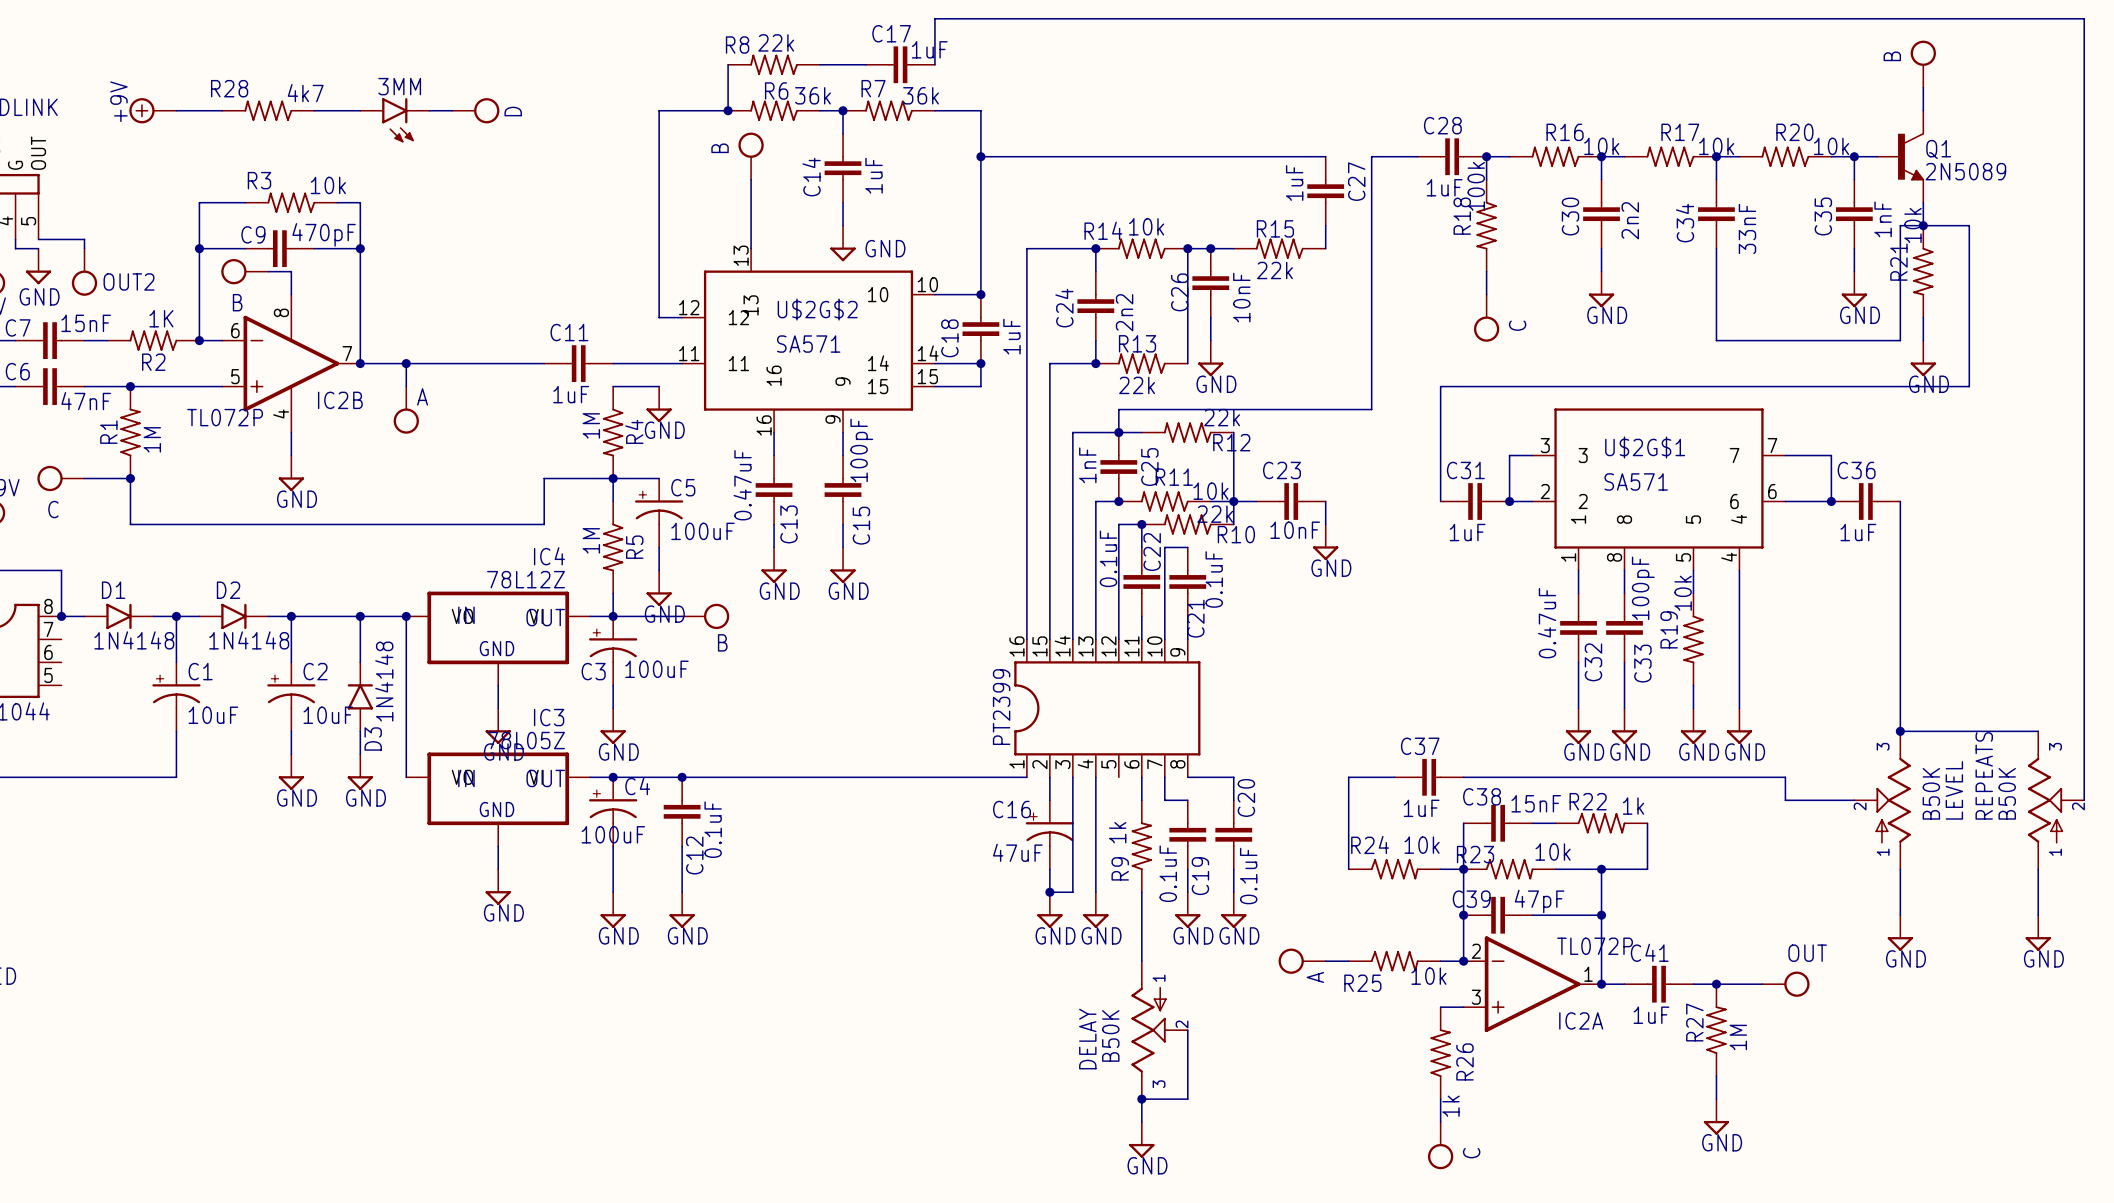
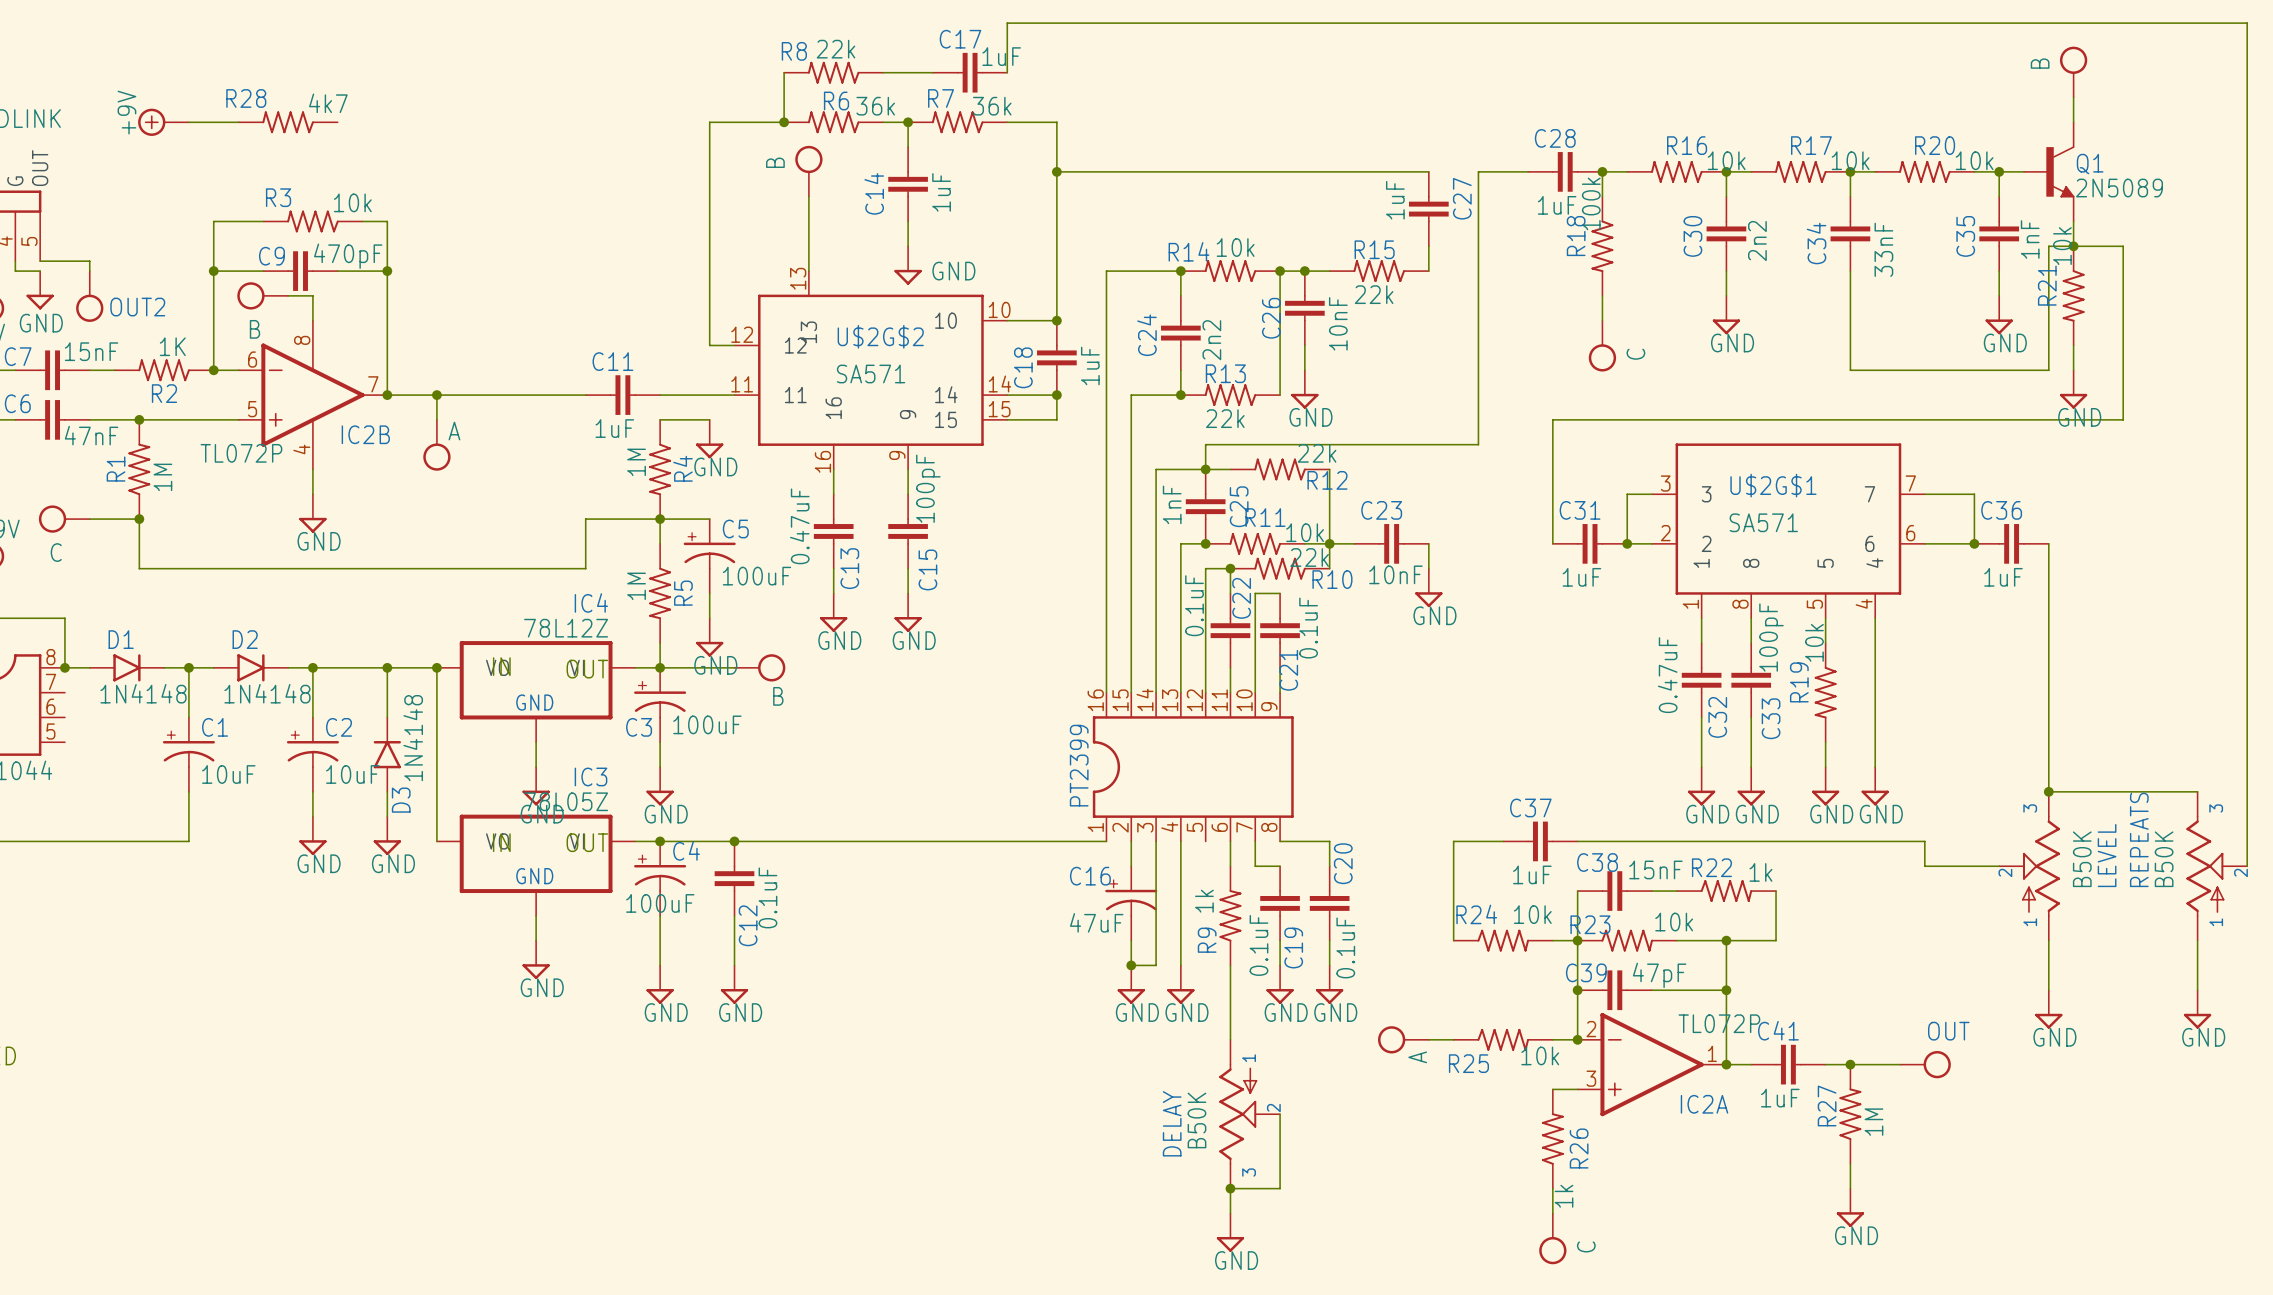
wire: (314, 110) (360, 110) -> none
wire: (429, 110) (452, 110) -> none
power symbol: D (475, 110) -> none
3MM: (394, 120) -> none

